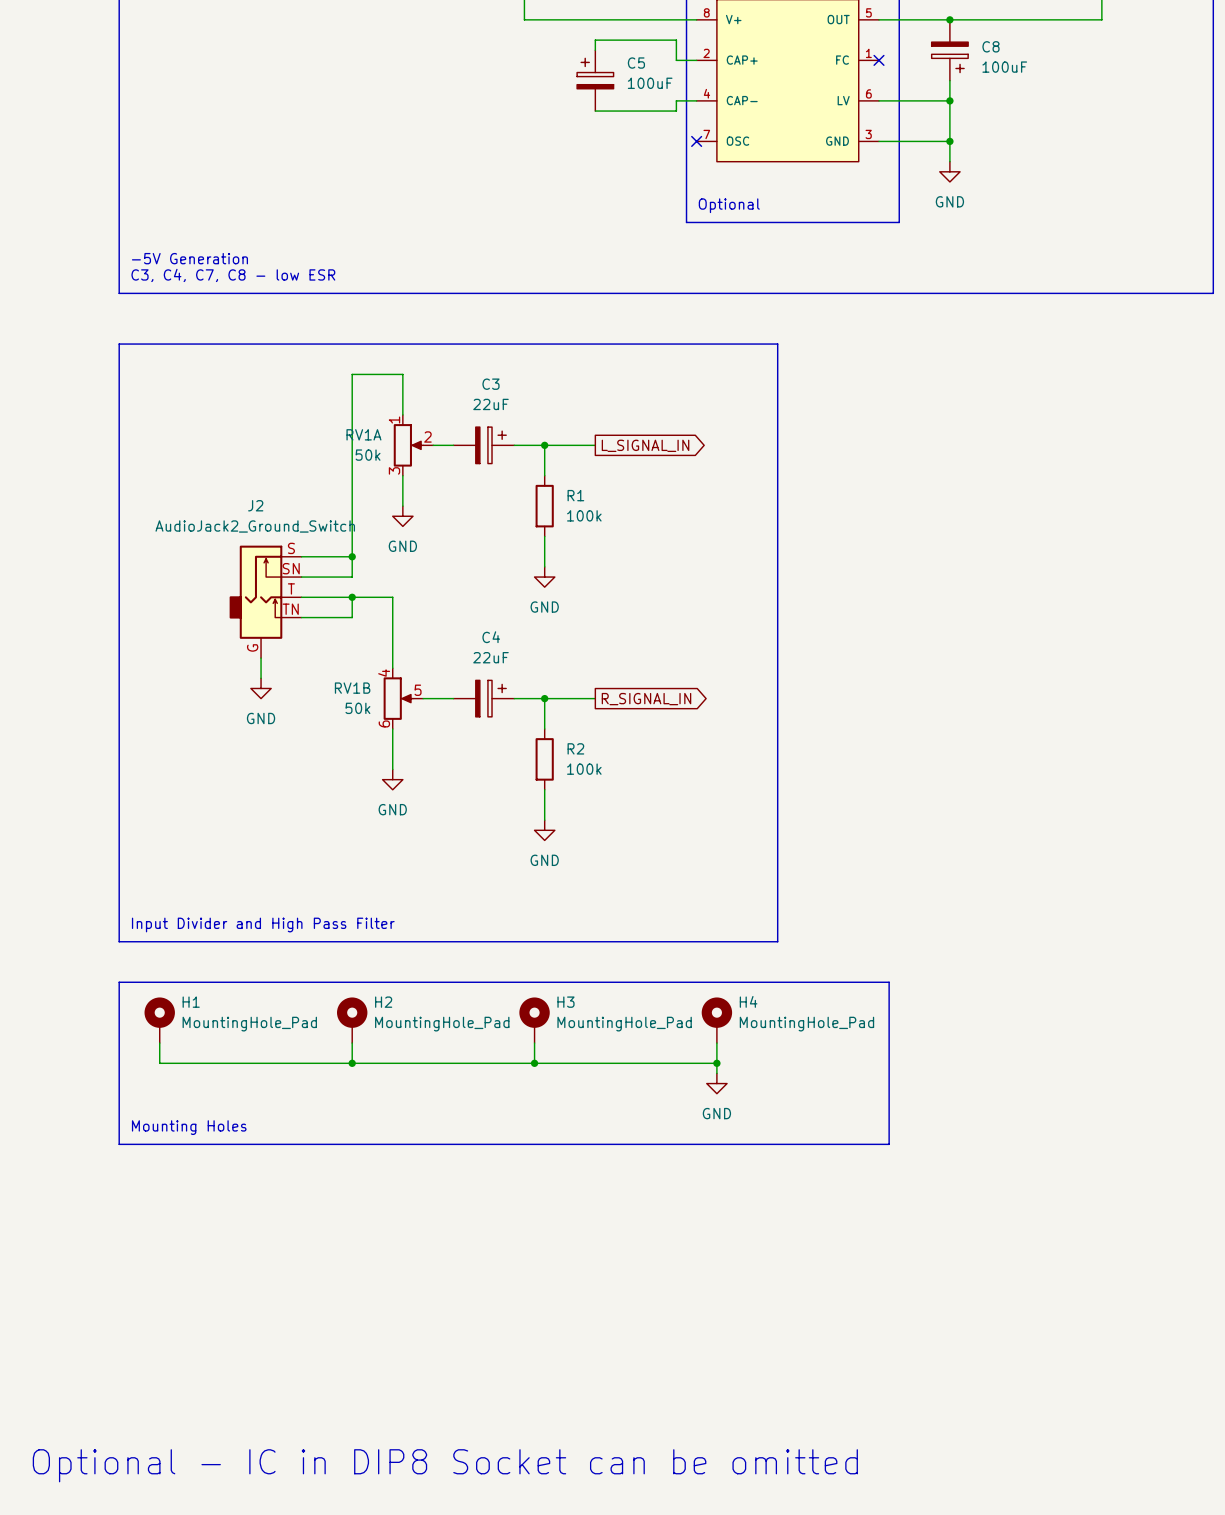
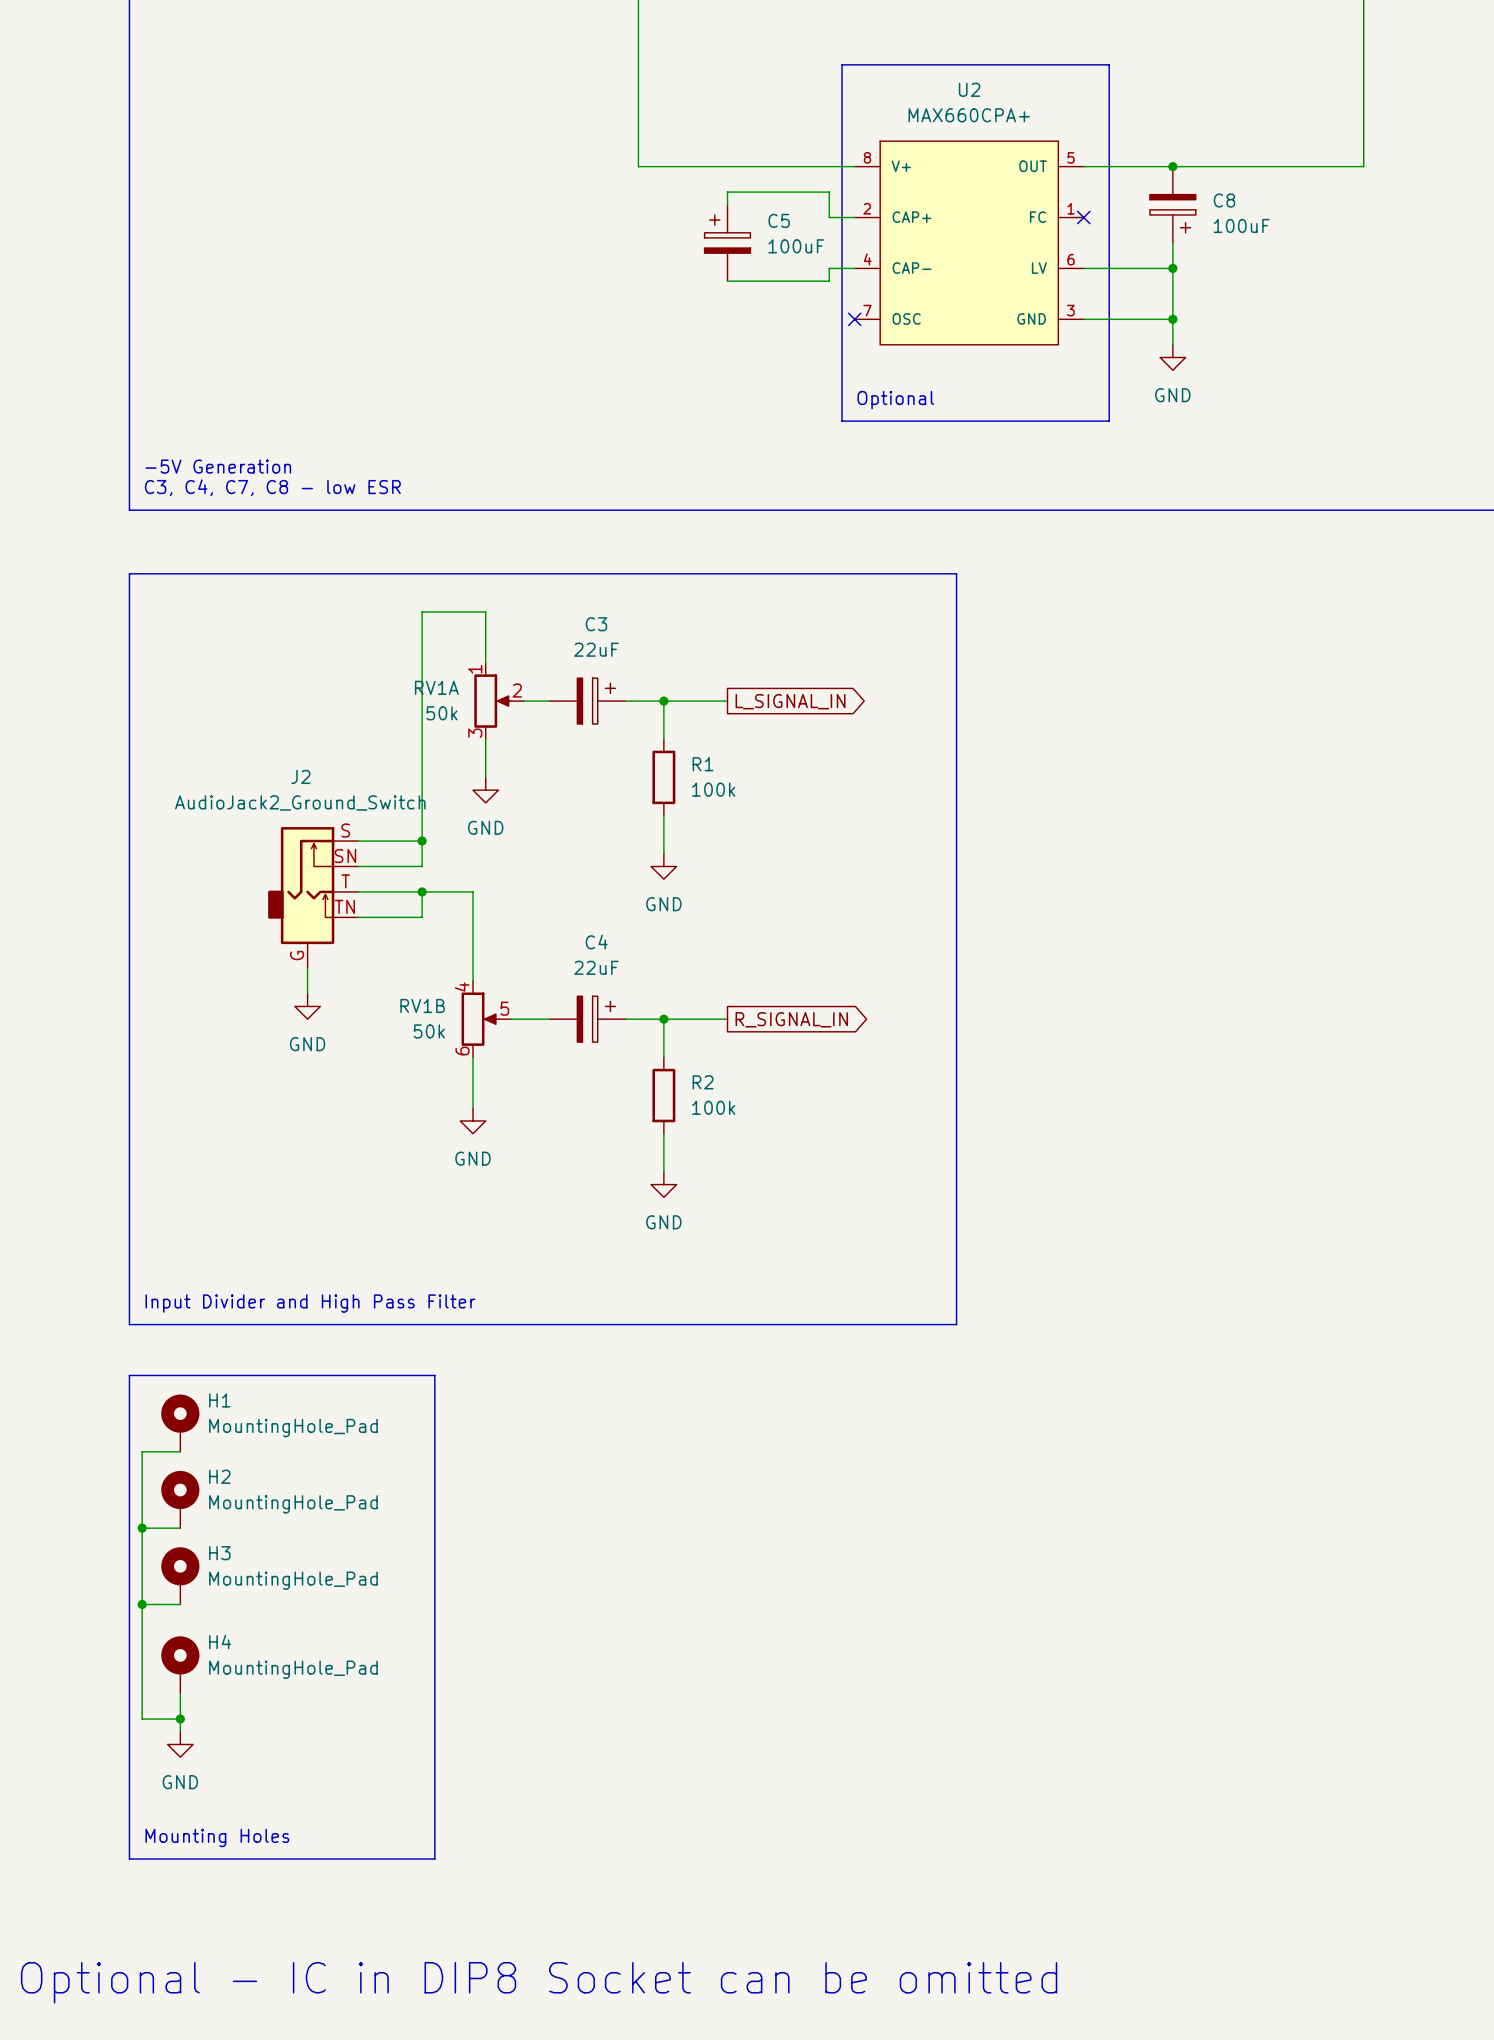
line: (362, 982) (889, 982) (889, 1144) (119, 1144) -> (434, 1375) (434, 1859) (129, 1859) (129, 1579)
H2 position: (352, 1020) -> (180, 1499)
H3 position: (534, 1020) -> (180, 1575)
H4 position: (716, 1020) -> (180, 1664)
wire: (159, 1043) (159, 1063) (716, 1063) -> (180, 1451) (142, 1451) (142, 1719) (180, 1719)
wire: (352, 1043) (352, 1063) -> none
wire: (534, 1043) (534, 1063) -> none
wire: (716, 1043) (716, 1073) -> none
junction: (352, 1063) -> none
junction: (534, 1063) -> none
junction: (716, 1063) -> none
power symbol: GND (716, 1083) -> none
wire: none -> (142, 1528) (180, 1528)
junction: none -> (142, 1528)
text: Mounting Holes (189, 1127) -> none
wire: none -> (142, 1604) (180, 1604)
junction: none -> (142, 1604)
wire: none -> (180, 1693) (180, 1731)
junction: none -> (180, 1719)
power symbol: none -> GND (180, 1744)
text: none -> Mounting Holes (217, 1837)

